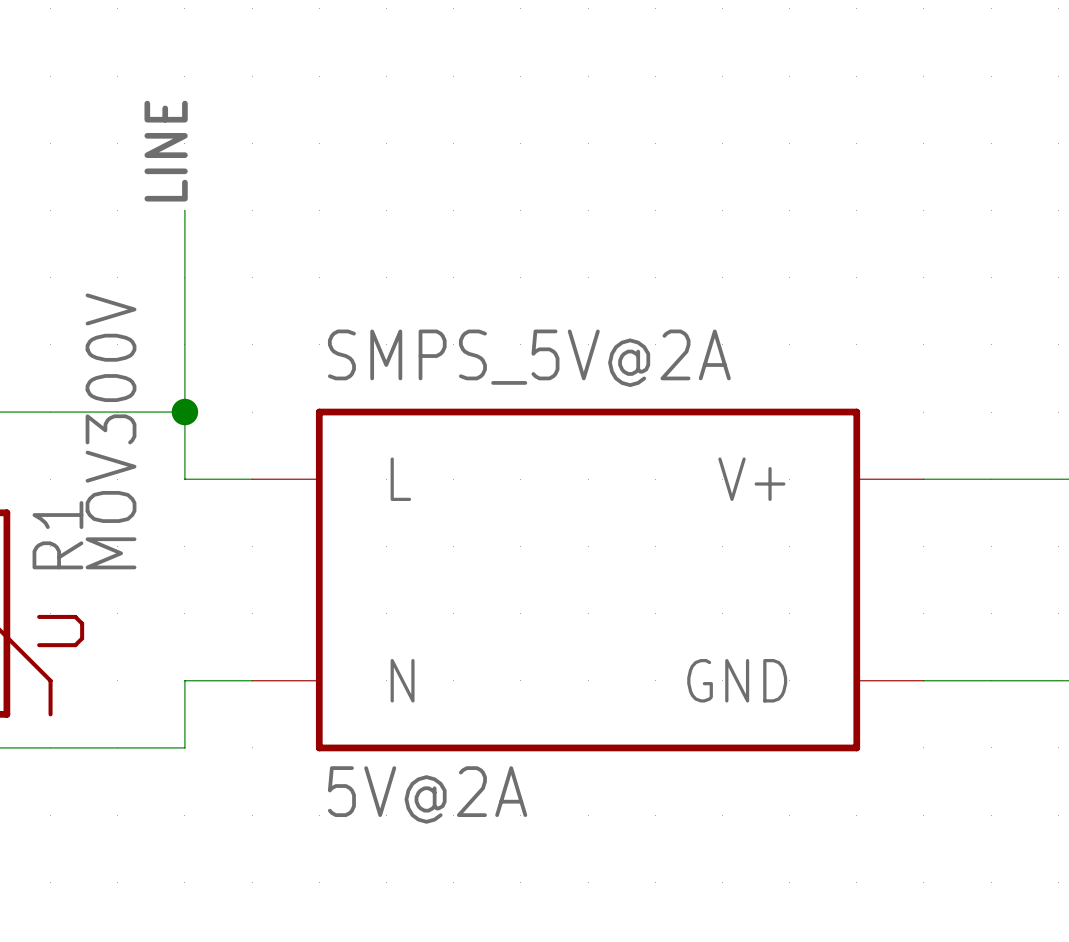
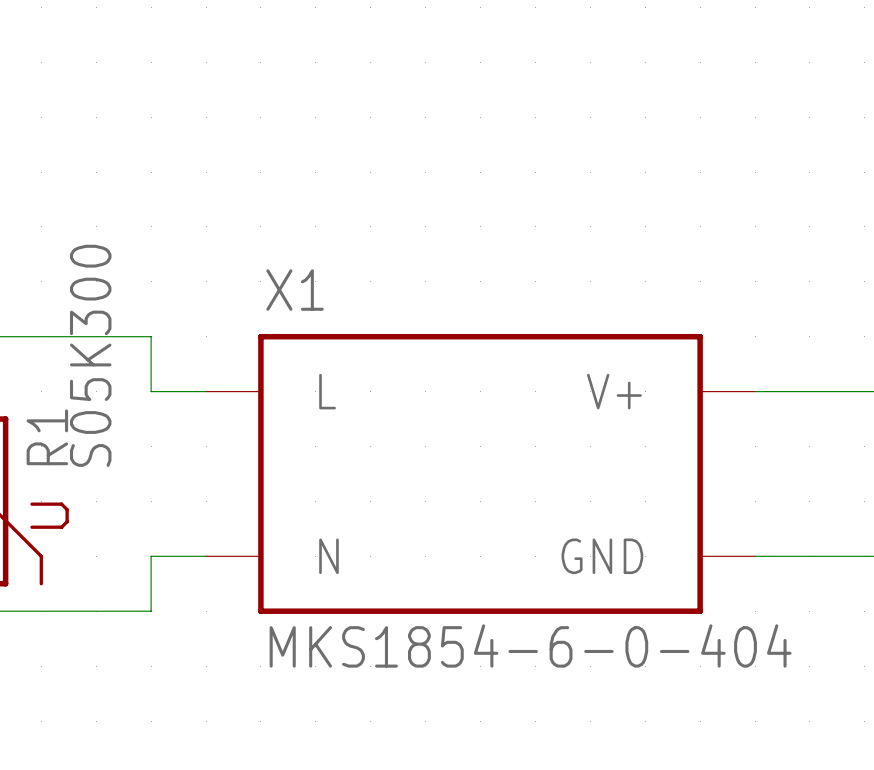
label: LINE (166, 151) -> none
wire: (184, 210) (184, 412) -> none
SMPS_5V@2A name: SMPS_5V@2A (529, 358) -> X1 (295, 290)
junction: (184, 412) -> none
R1 value: MOV300V (111, 431) -> S05K300 (90, 355)
SMPS_5V@2A value: 5V@2A (427, 794) -> MKS1854-6-0-404 (530, 645)

